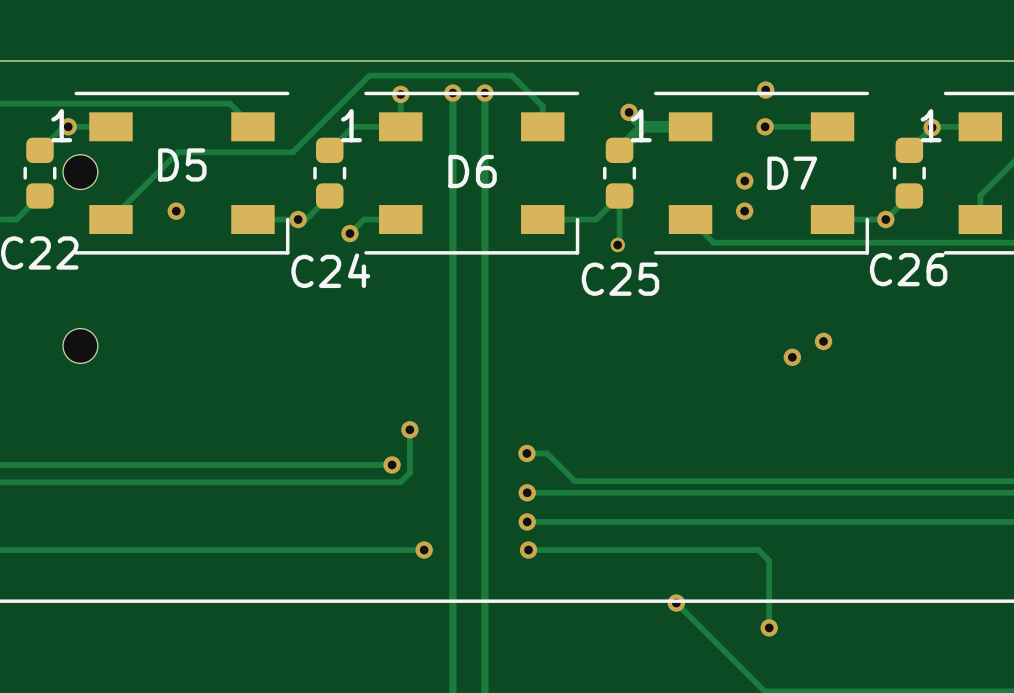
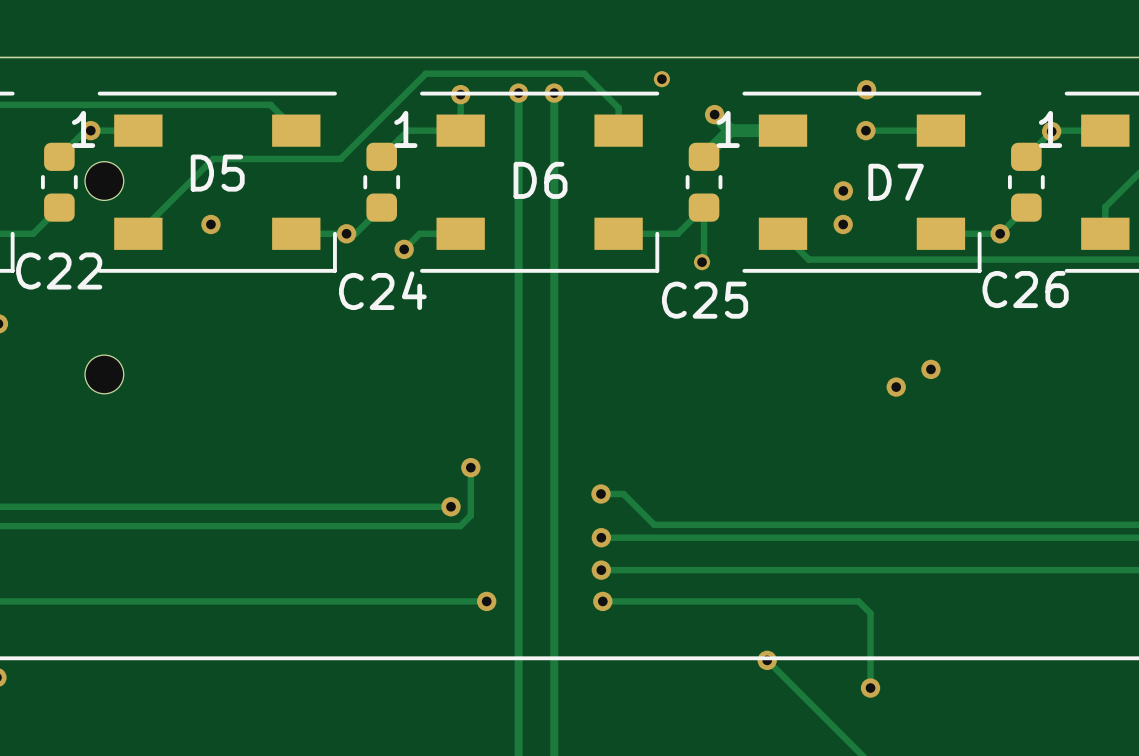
via: none -> (661, 79)

